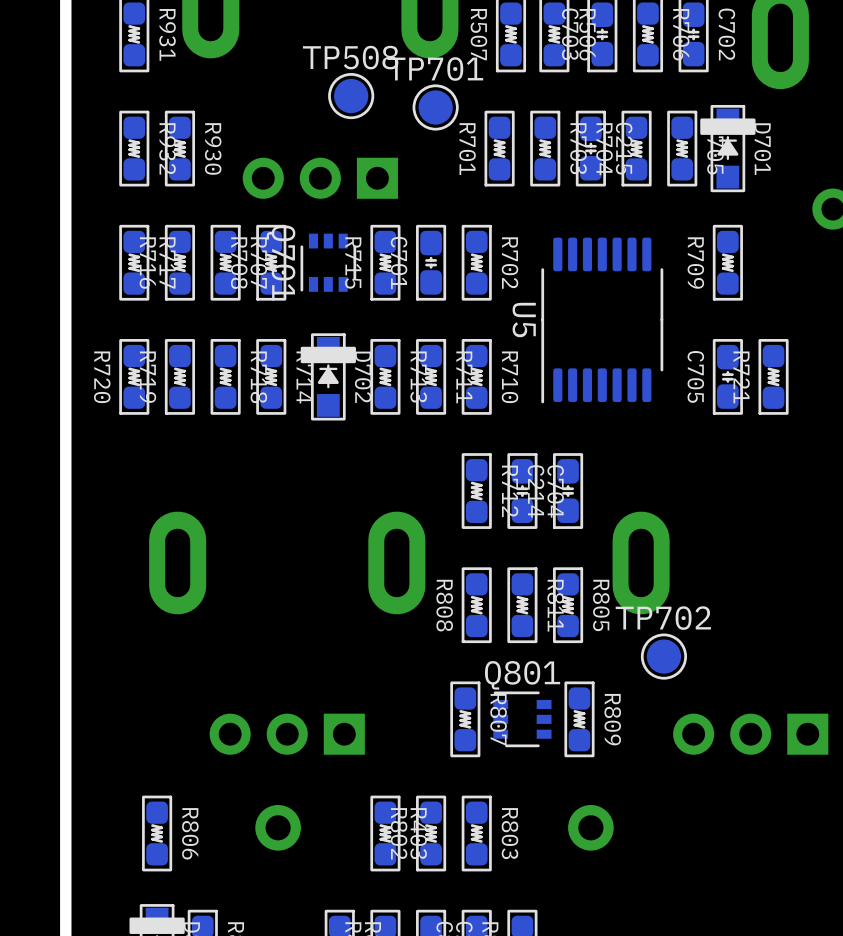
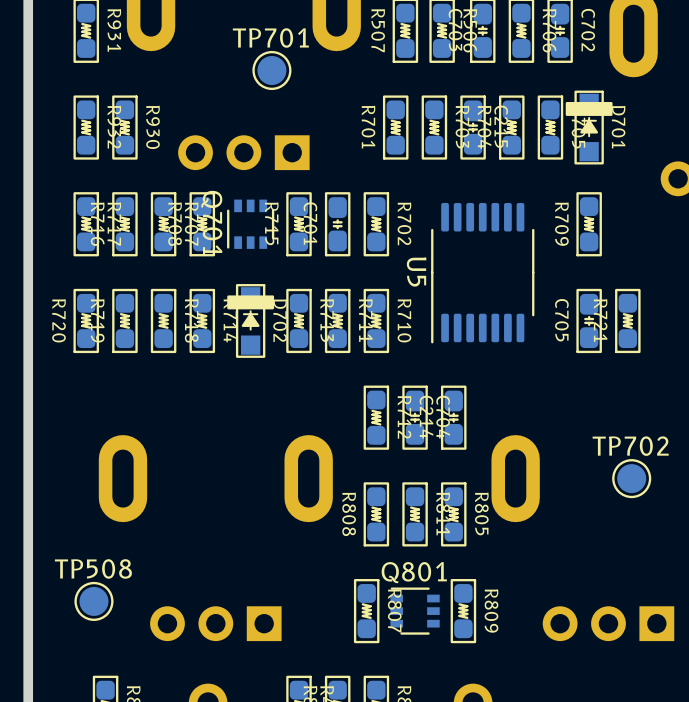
TP508 position: (351, 96) -> (93, 601)
TP701 position: (435, 107) -> (271, 70)
TP702 position: (663, 656) -> (631, 478)

